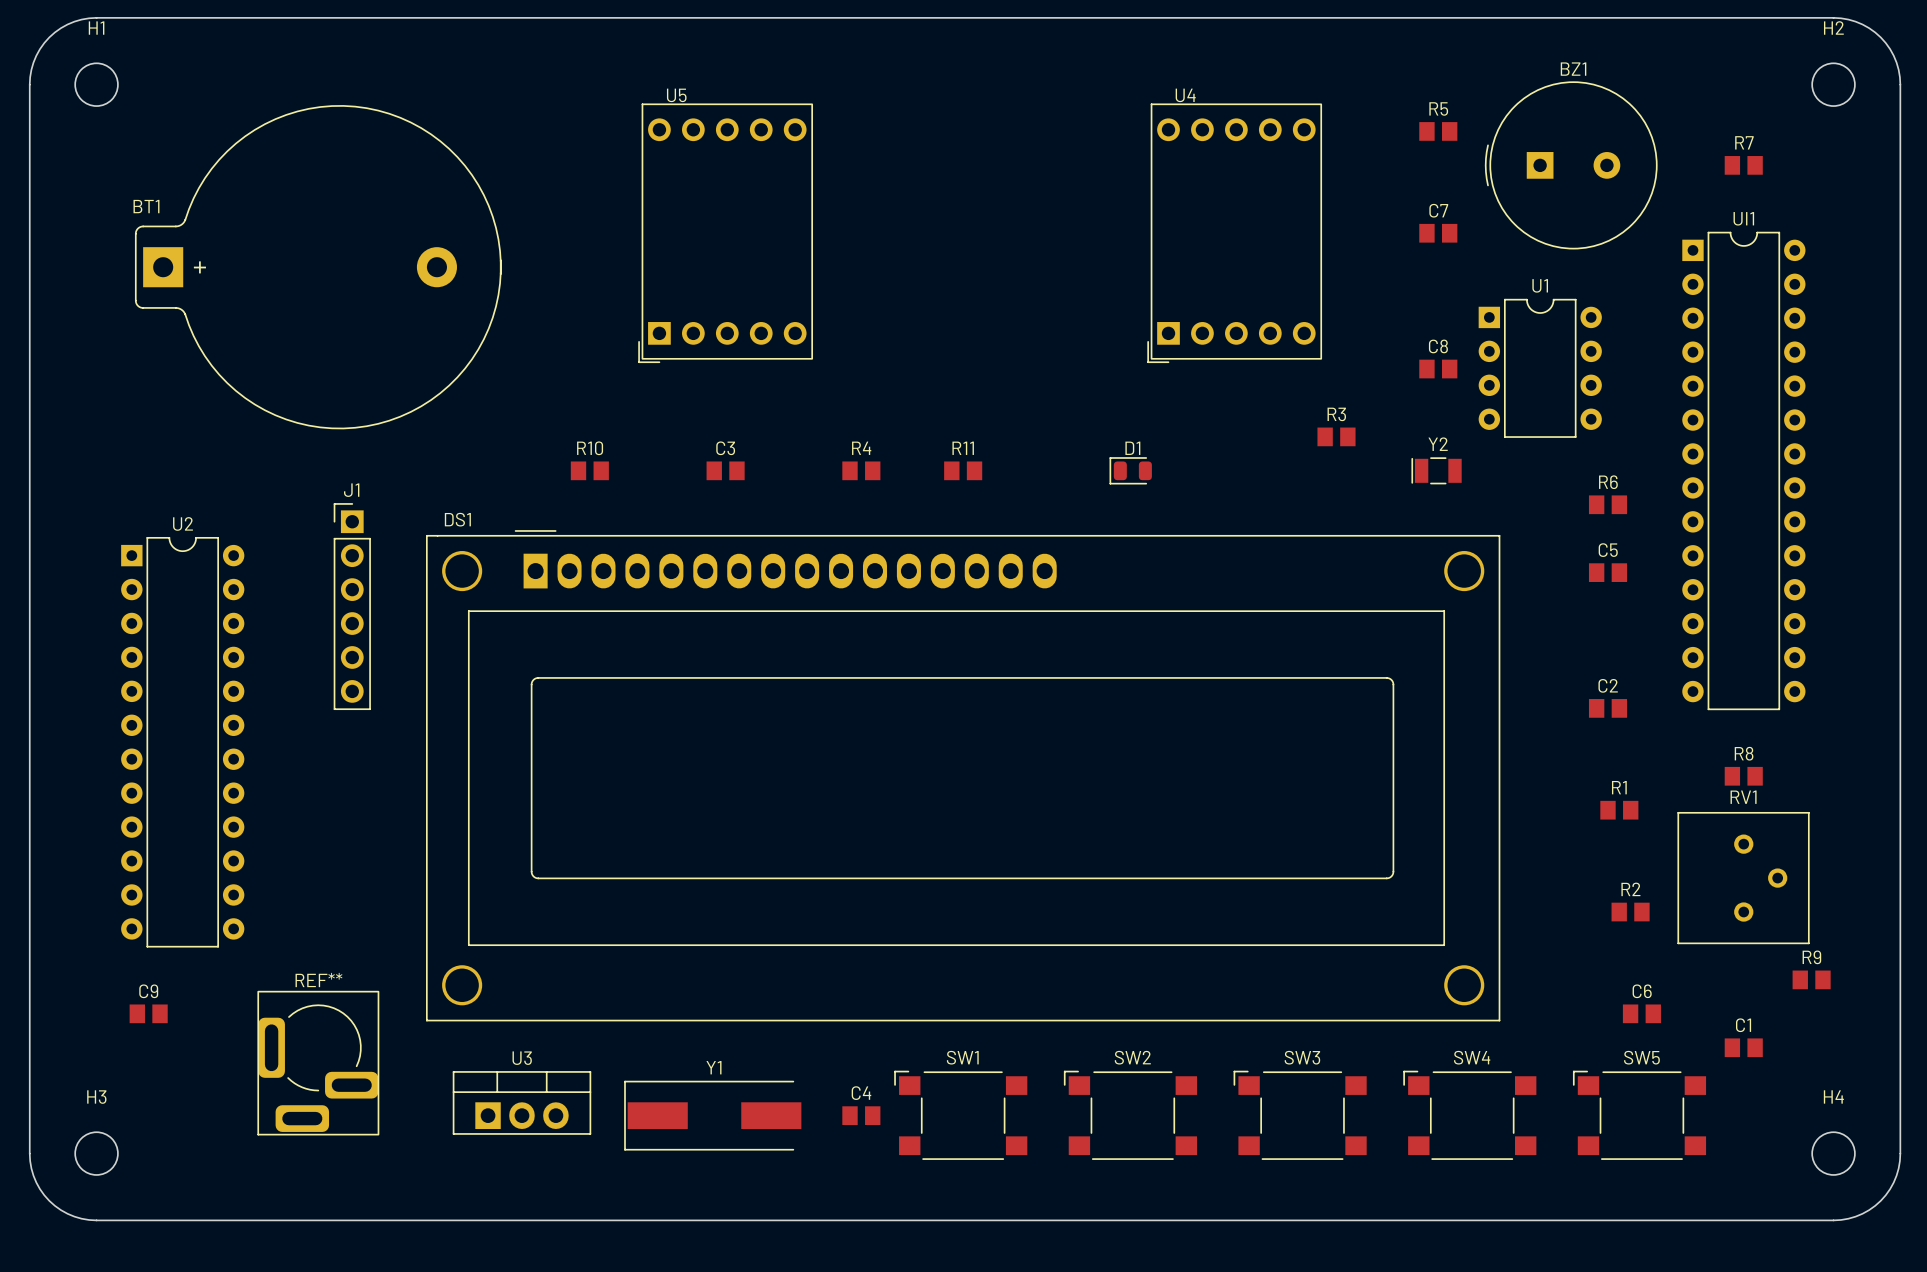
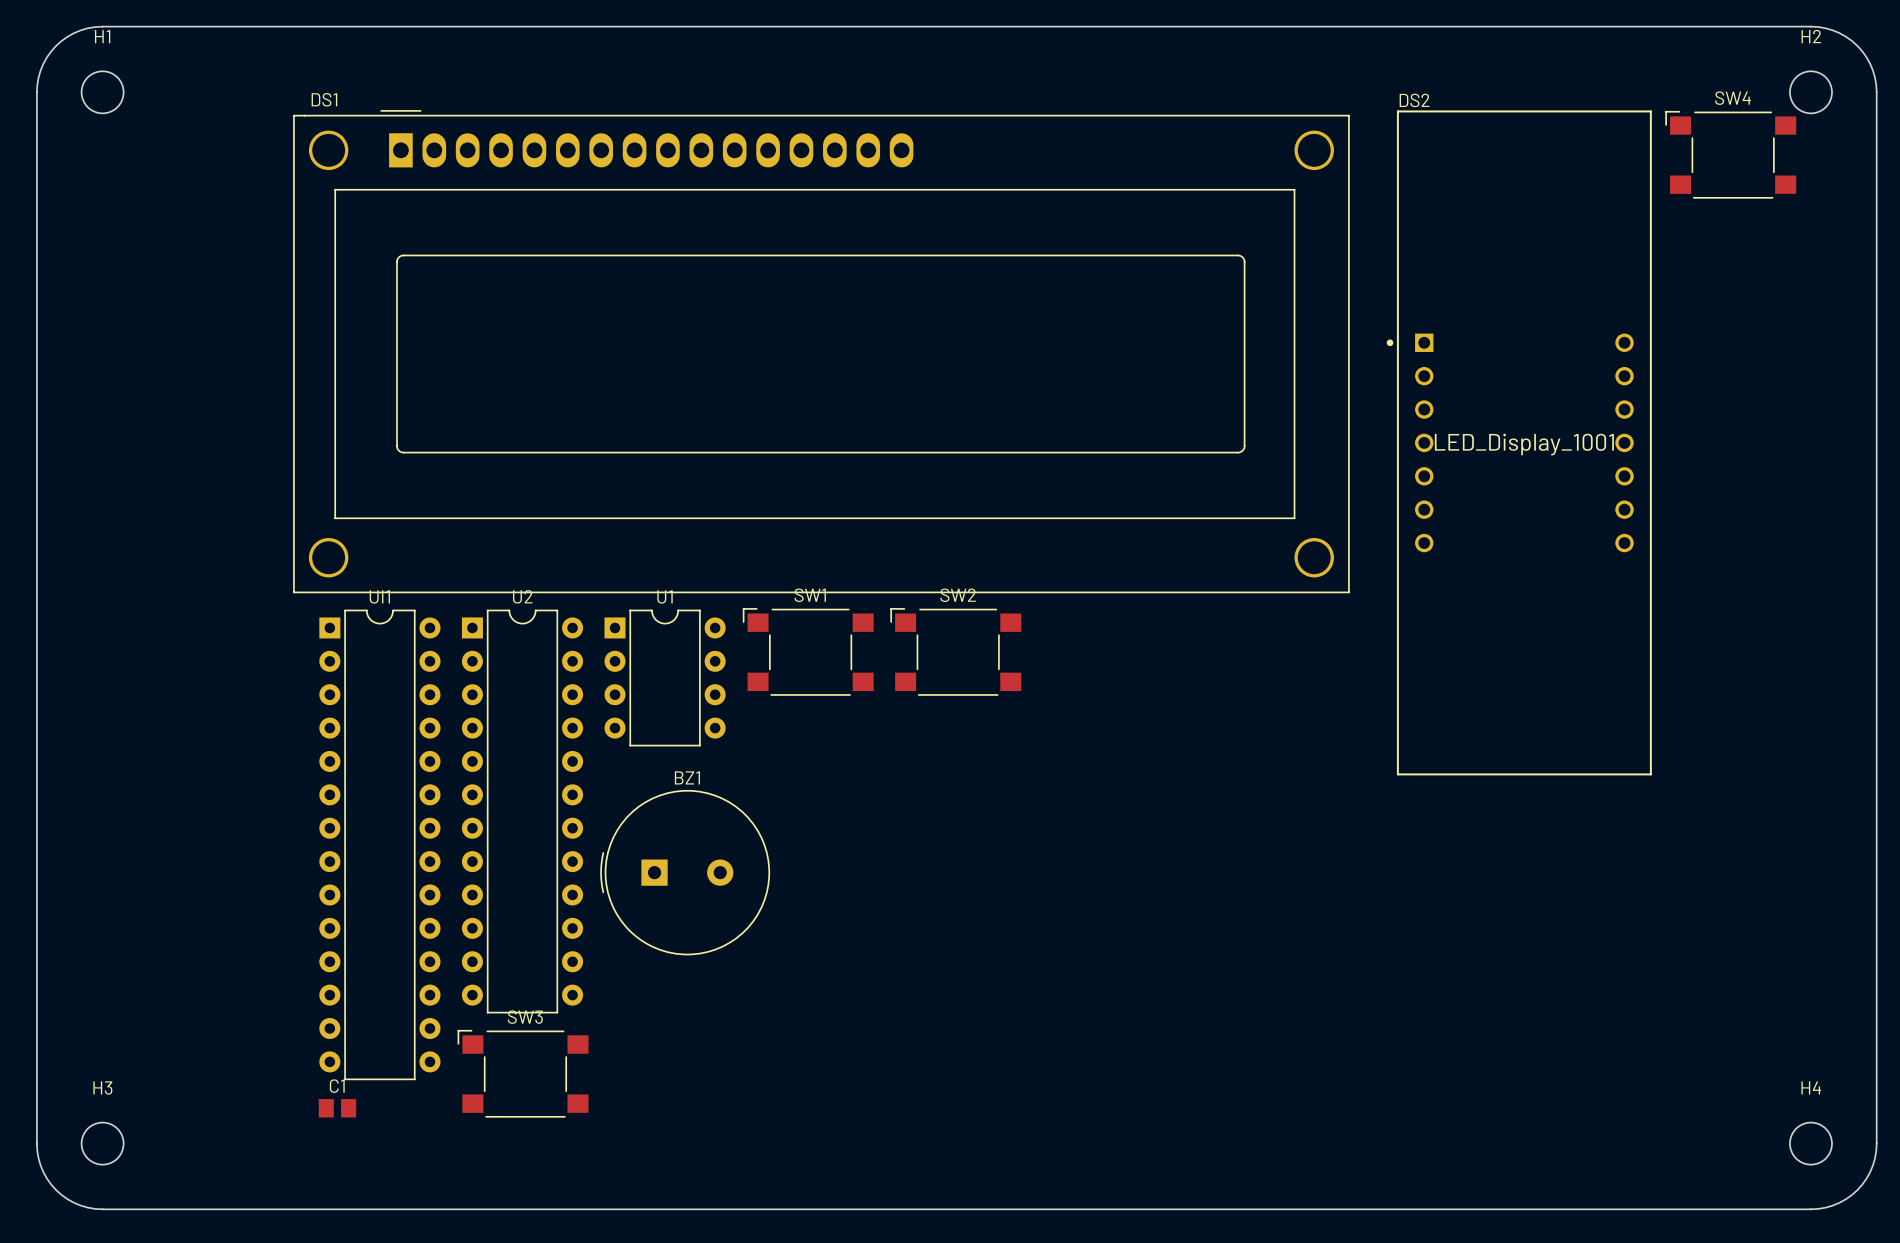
R5: (1438, 131) -> none
BZ1 position: (1571, 165) -> (685, 872)
R7: (1743, 165) -> none
U5: (725, 233) -> none
U4: (1234, 233) -> none
C7: (1438, 233) -> none
BT1: (318, 267) -> none
U1 position: (1540, 368) -> (665, 678)
C8: (1438, 369) -> none
R3: (1336, 436) -> none
DS2: none -> LED_Display_1001 (1519, 442)
R10: (589, 470) -> none
C3: (725, 470) -> none
R4: (861, 470) -> none
R11: (963, 470) -> none
D1: (1130, 470) -> none
Y2: (1436, 470) -> none
UI1 position: (1743, 470) -> (379, 844)
R6: (1608, 504) -> none
C5: (1608, 572) -> none
J1: (352, 606) -> none
C2: (1608, 708) -> none
U2 position: (182, 742) -> (522, 811)
DS1 position: (963, 775) -> (821, 351)
R8: (1743, 776) -> none
R1: (1619, 810) -> none
RV1: (1743, 878) -> none
R2: (1630, 912) -> none
R9: (1811, 979) -> none
C9: (148, 1013) -> none
C6: (1641, 1013) -> none
C1 position: (1743, 1047) -> (337, 1108)
part: (318, 1063) -> none
U3: (521, 1102) -> none
Y1: (712, 1115) -> none
C4: (861, 1115) -> none
SW1 position: (960, 1115) -> (808, 651)
SW2 position: (1130, 1115) -> (955, 651)
SW3 position: (1300, 1115) -> (523, 1073)
SW4 position: (1469, 1115) -> (1730, 154)
SW5: (1639, 1115) -> none

